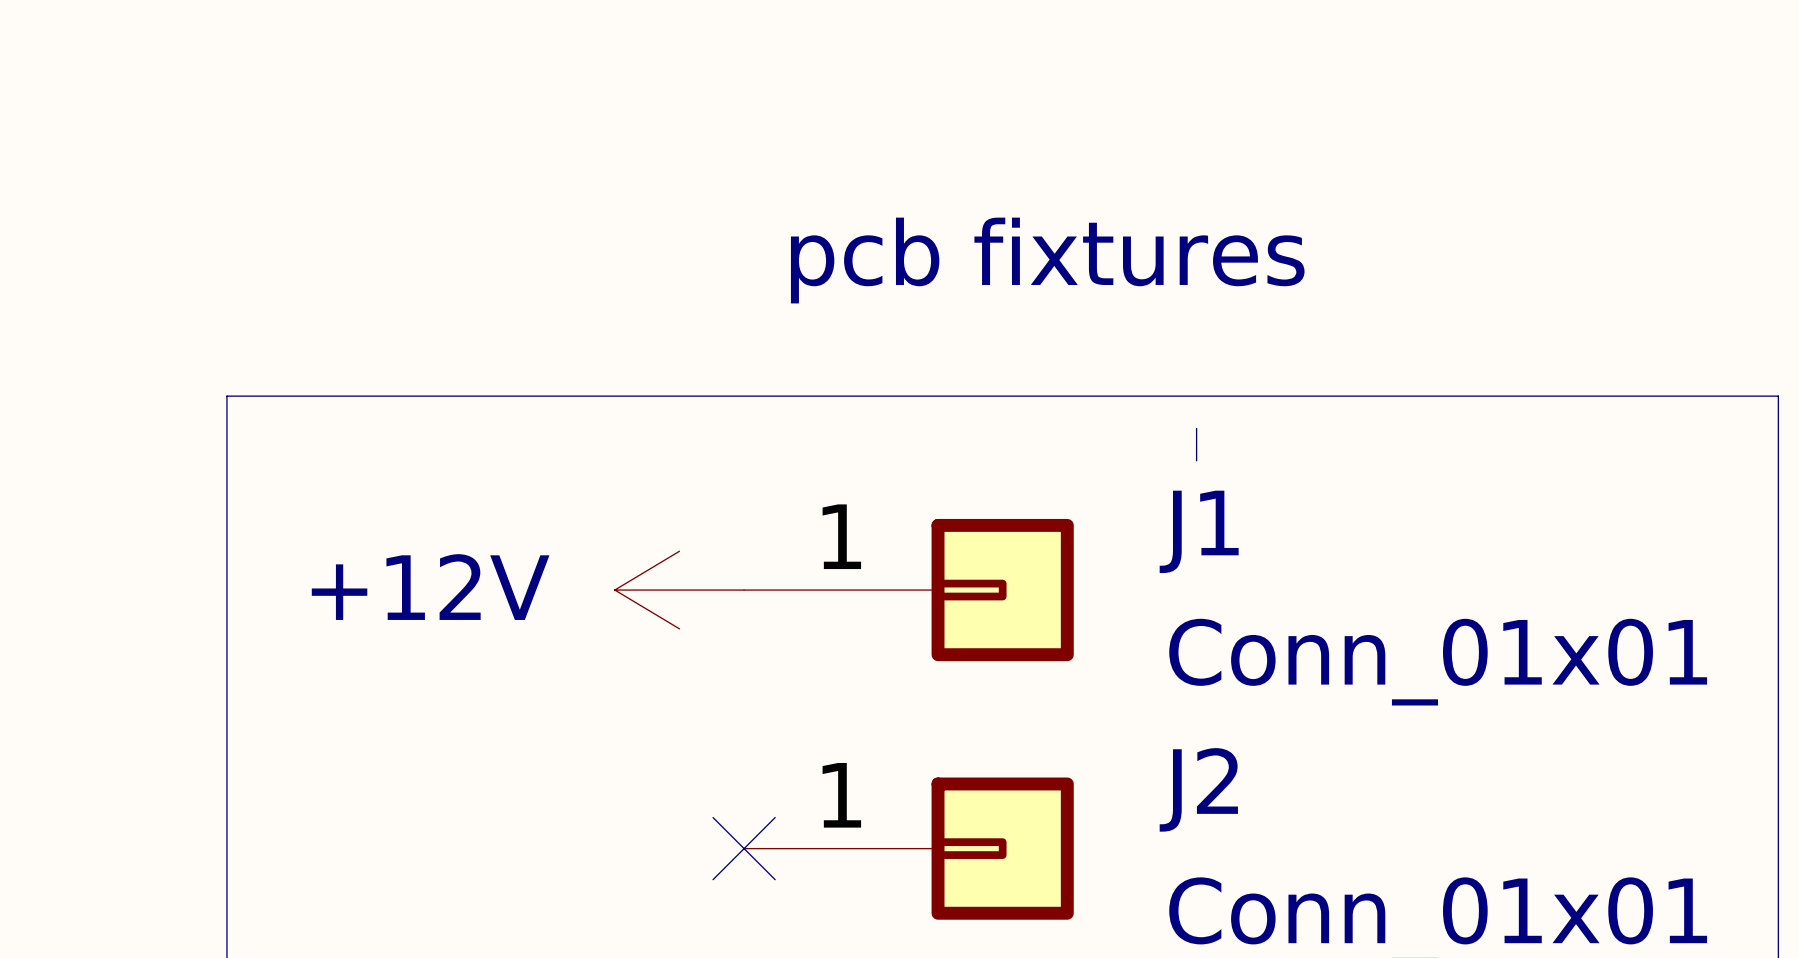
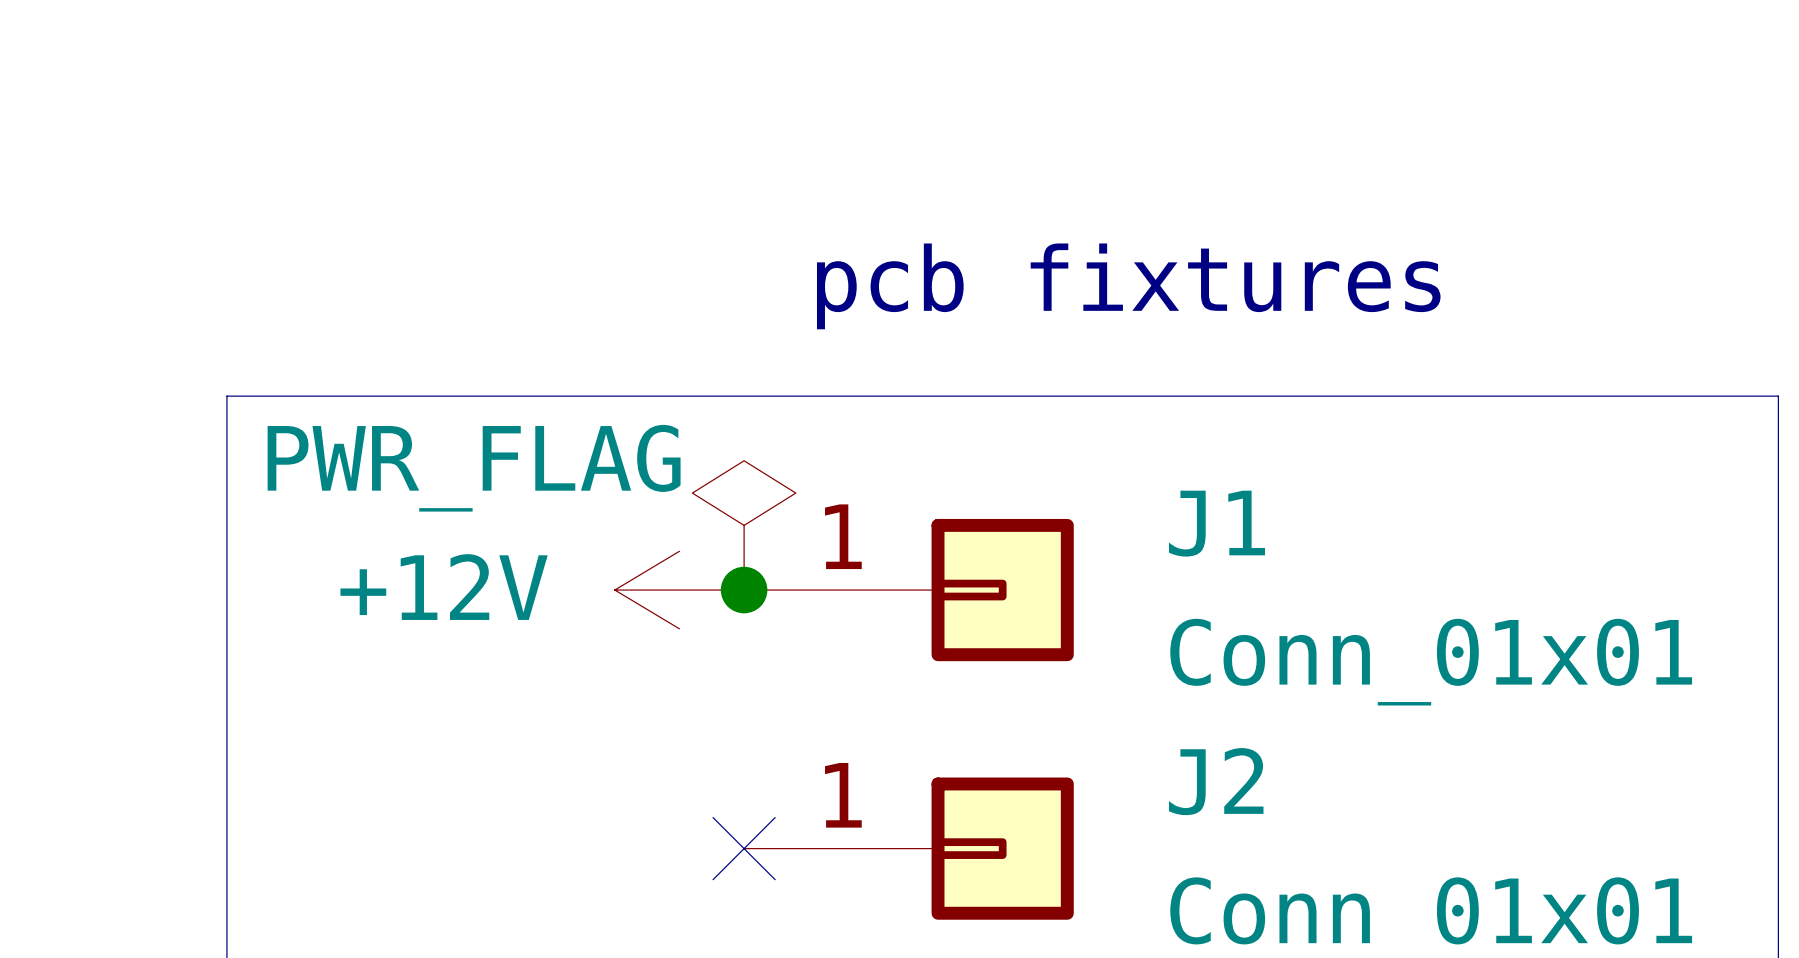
text position: pcb fixtures (1047, 260) -> pcb fixtures (1128, 286)
line: (1196, 428) (1196, 460) -> none
power symbol: none -> PWR_FLAG (744, 525)
junction: none -> (744, 590)

